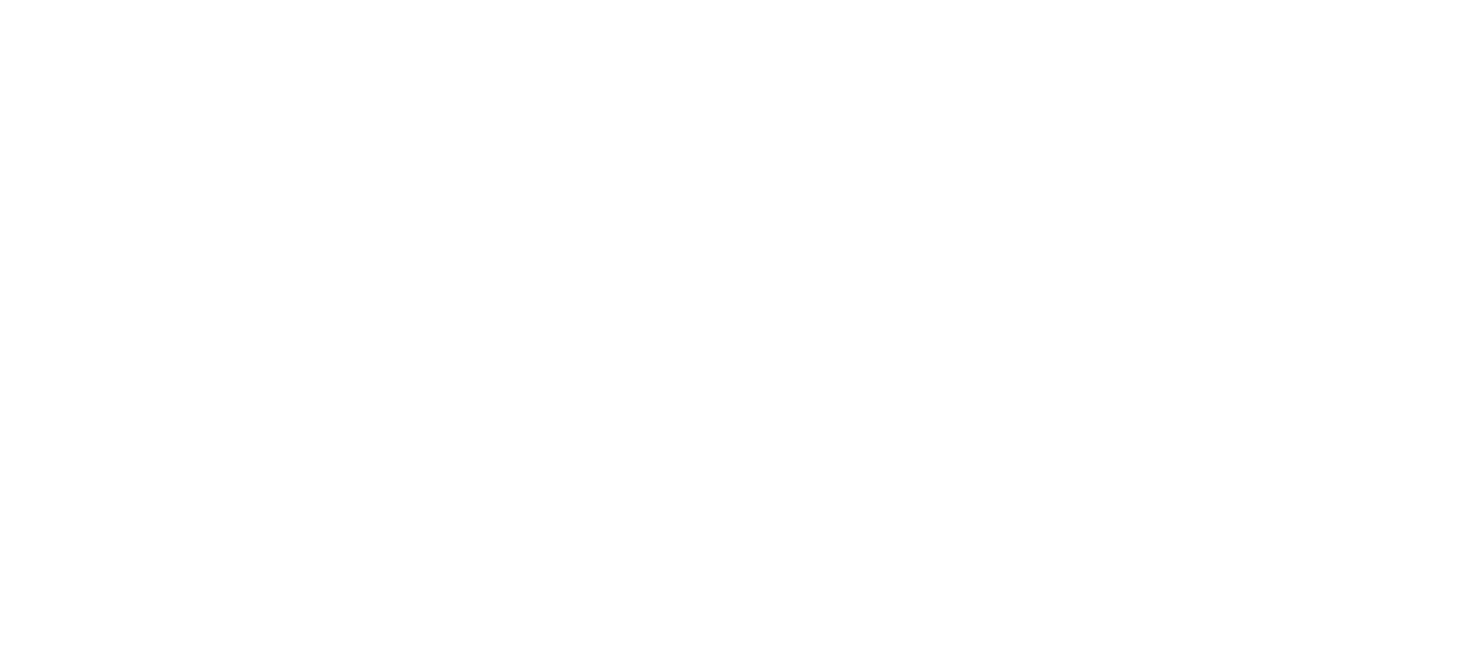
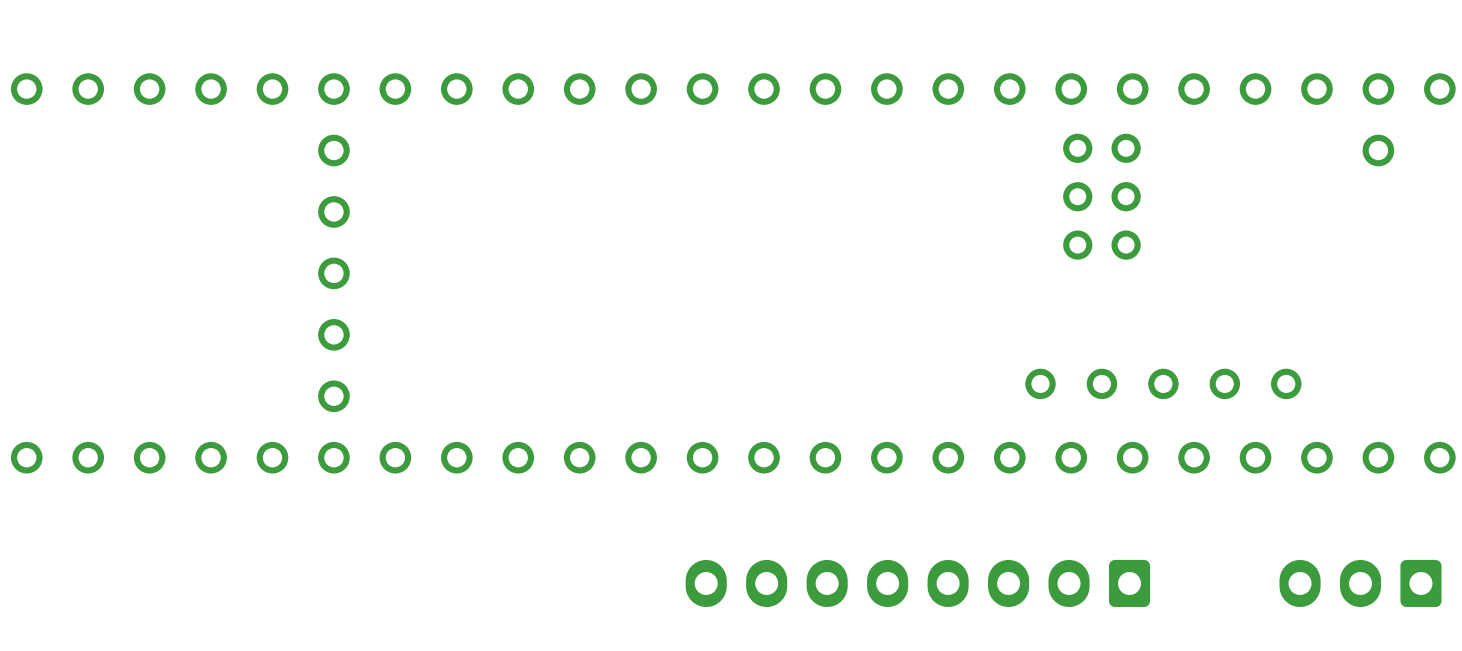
part: none -> (733, 273)
part: none -> (917, 583)
part: none -> (1360, 583)

